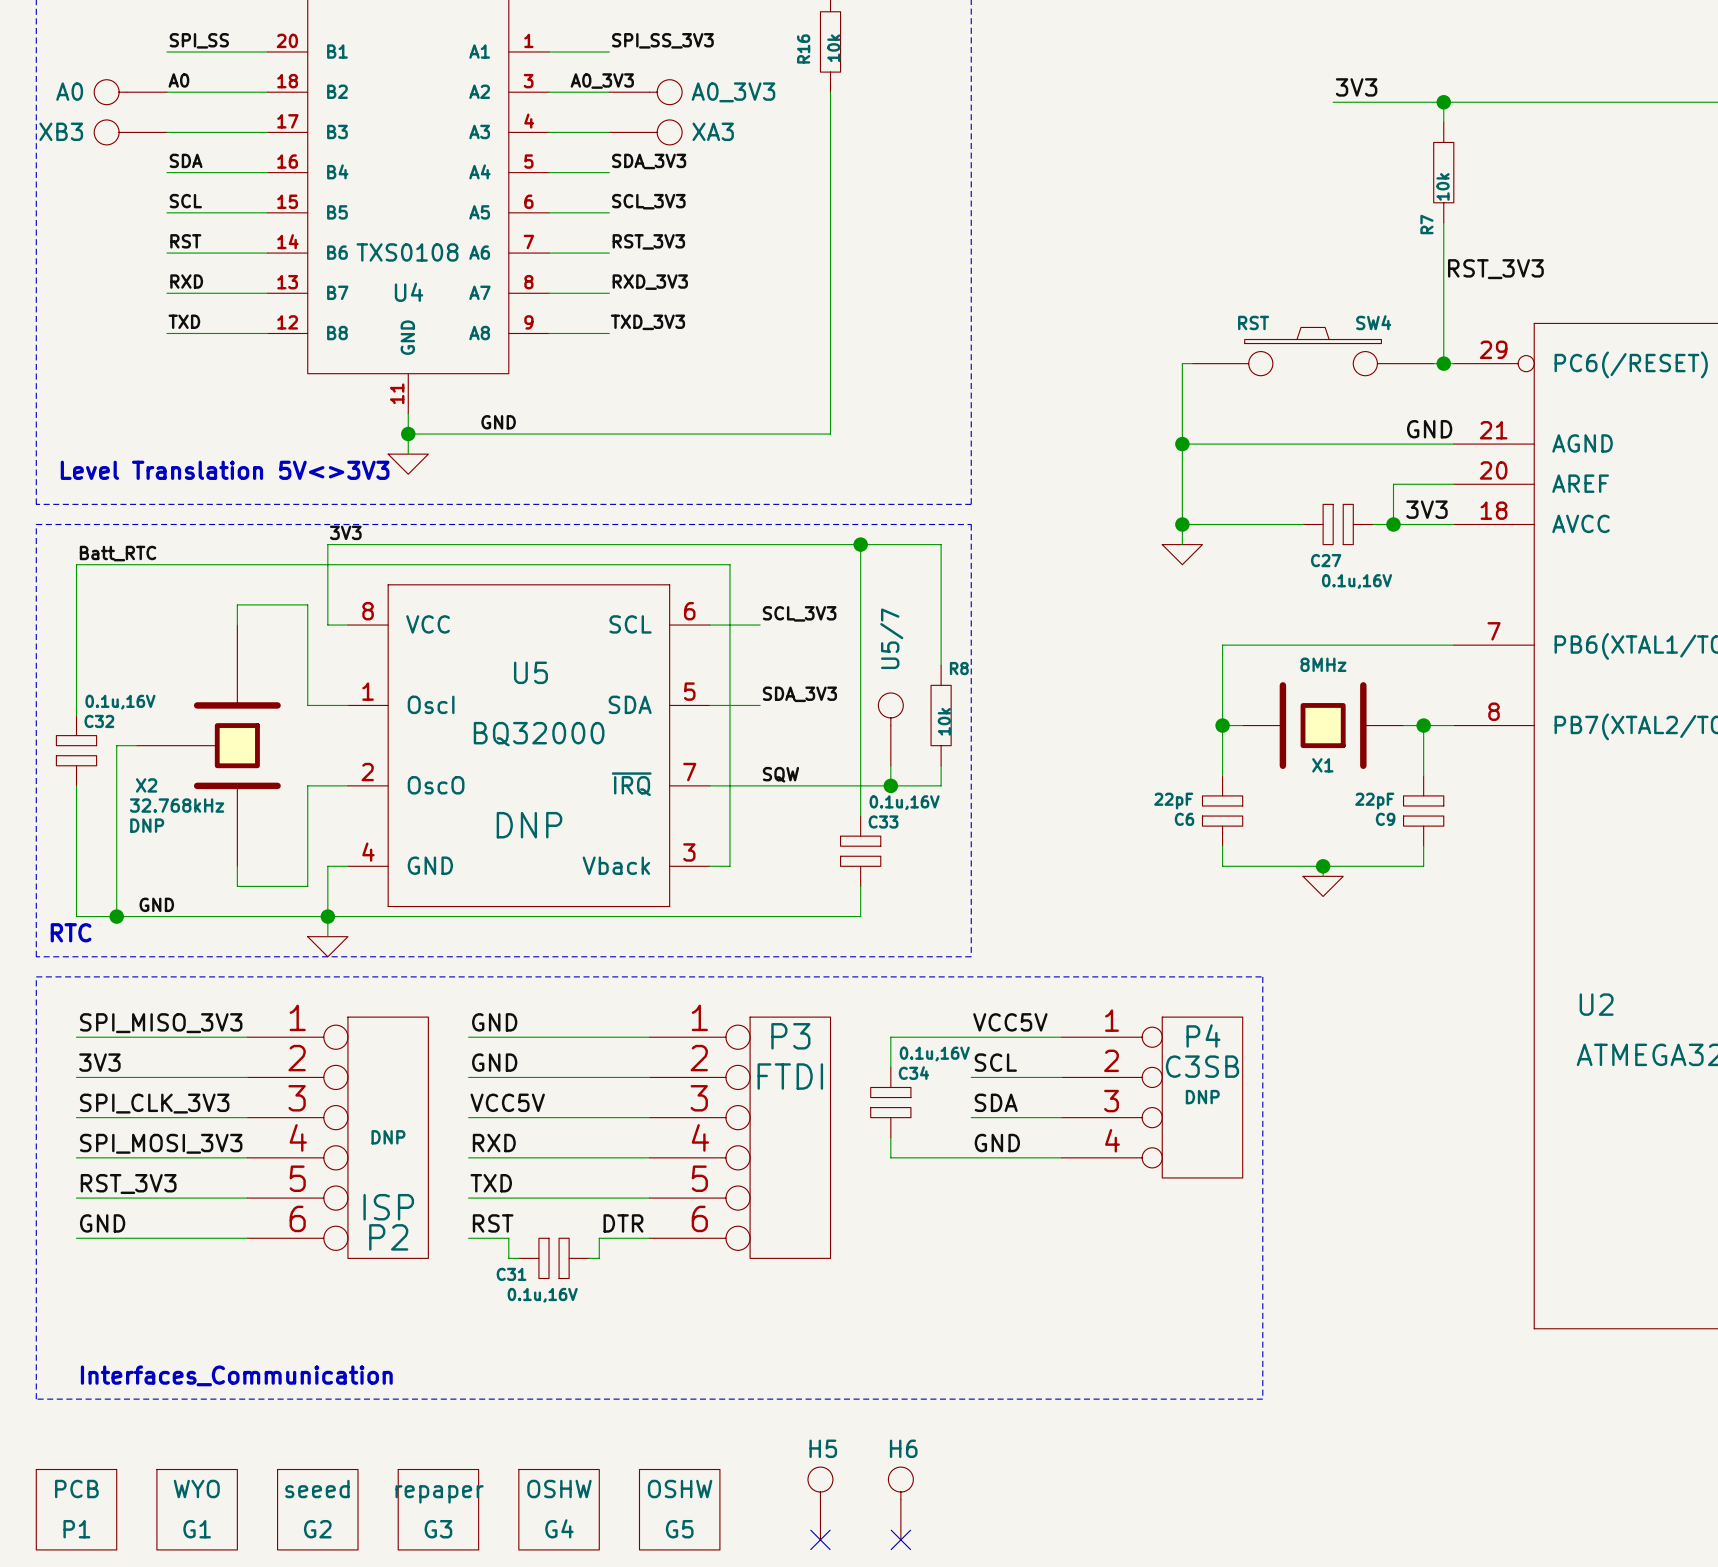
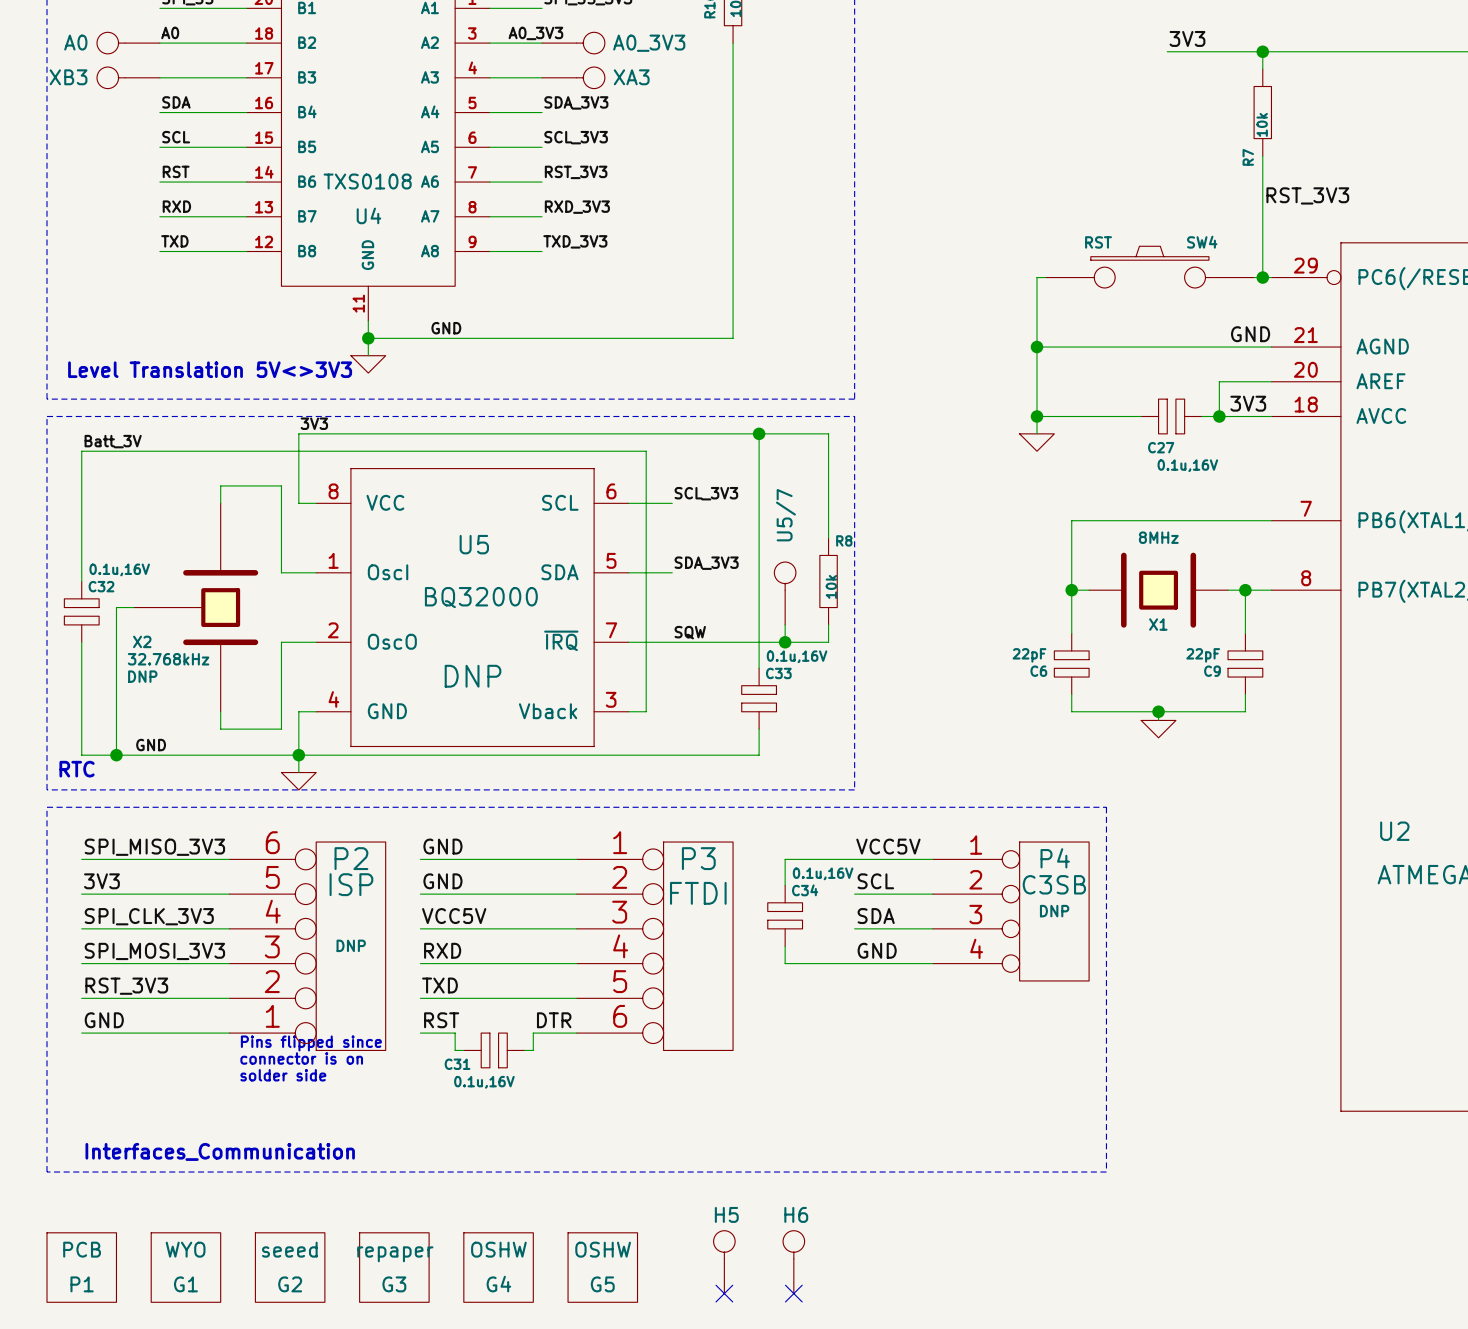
label: Batt_RTC (118, 553) -> Batt_3V (113, 441)
P2 flip: as is (388, 1137) -> up-down (350, 946)
text: none -> Pins flipped since (311, 1043)
text: none -> connector is on (301, 1058)
text: none -> solder side (283, 1075)

